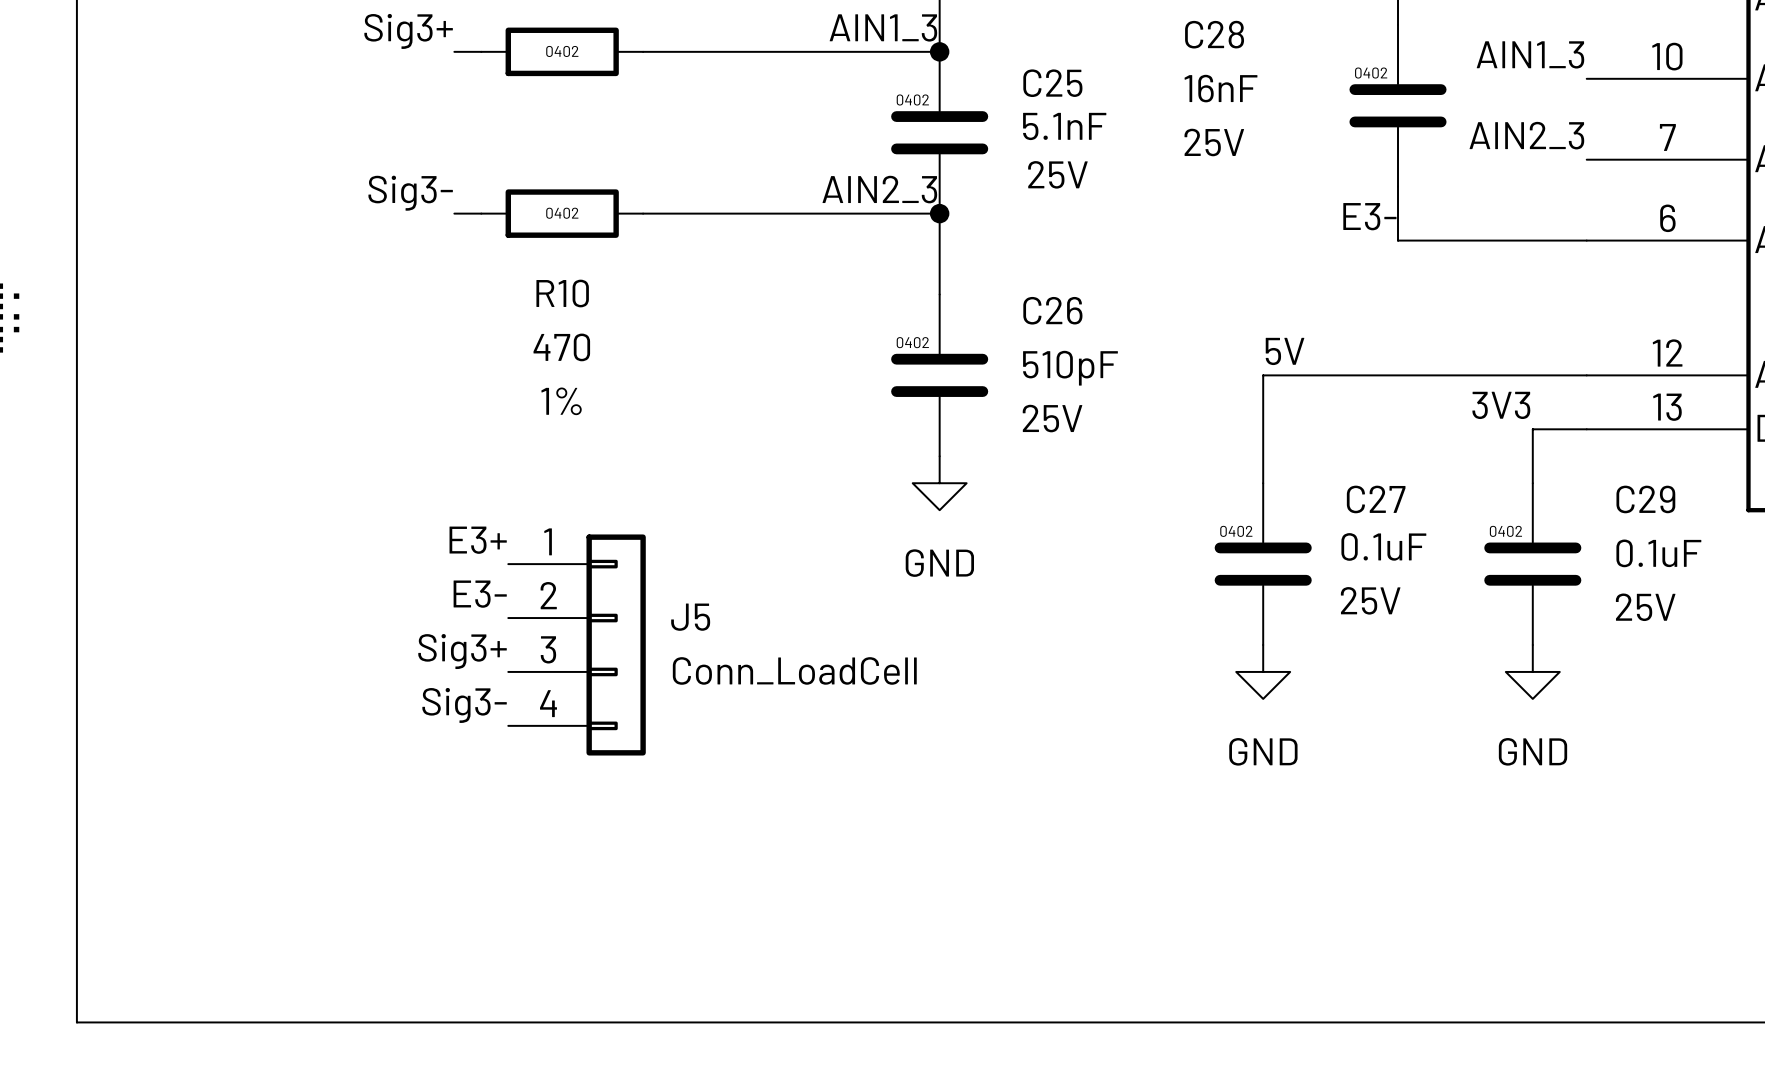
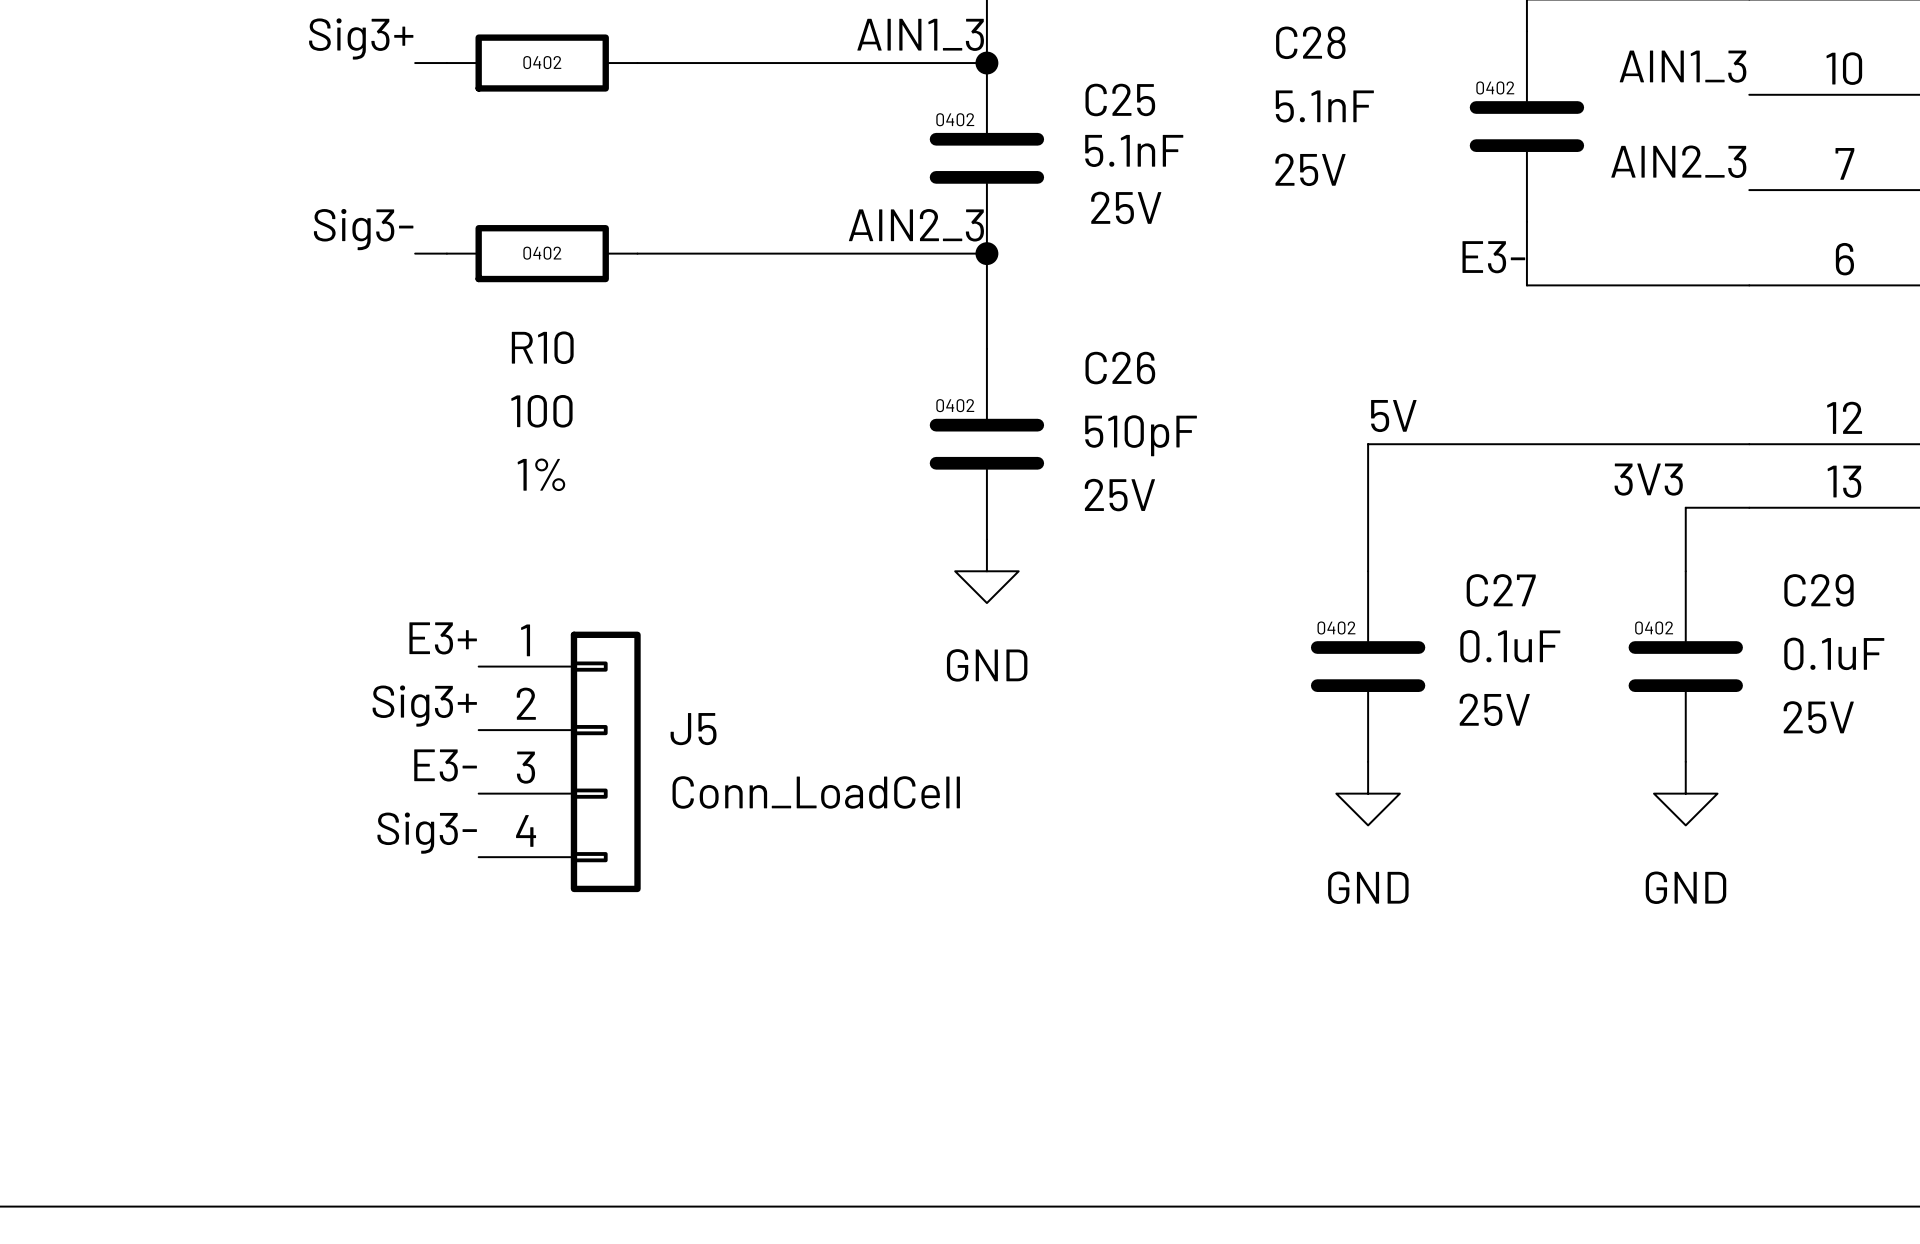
C28 value: 16nF (1220, 88) -> 5.1nF (1324, 106)
R10 value: 470 (561, 347) -> 100 (541, 411)
label: E3- (480, 594) -> Sig3+ (424, 706)
label: Sig3+ (462, 651) -> E3- (445, 765)

